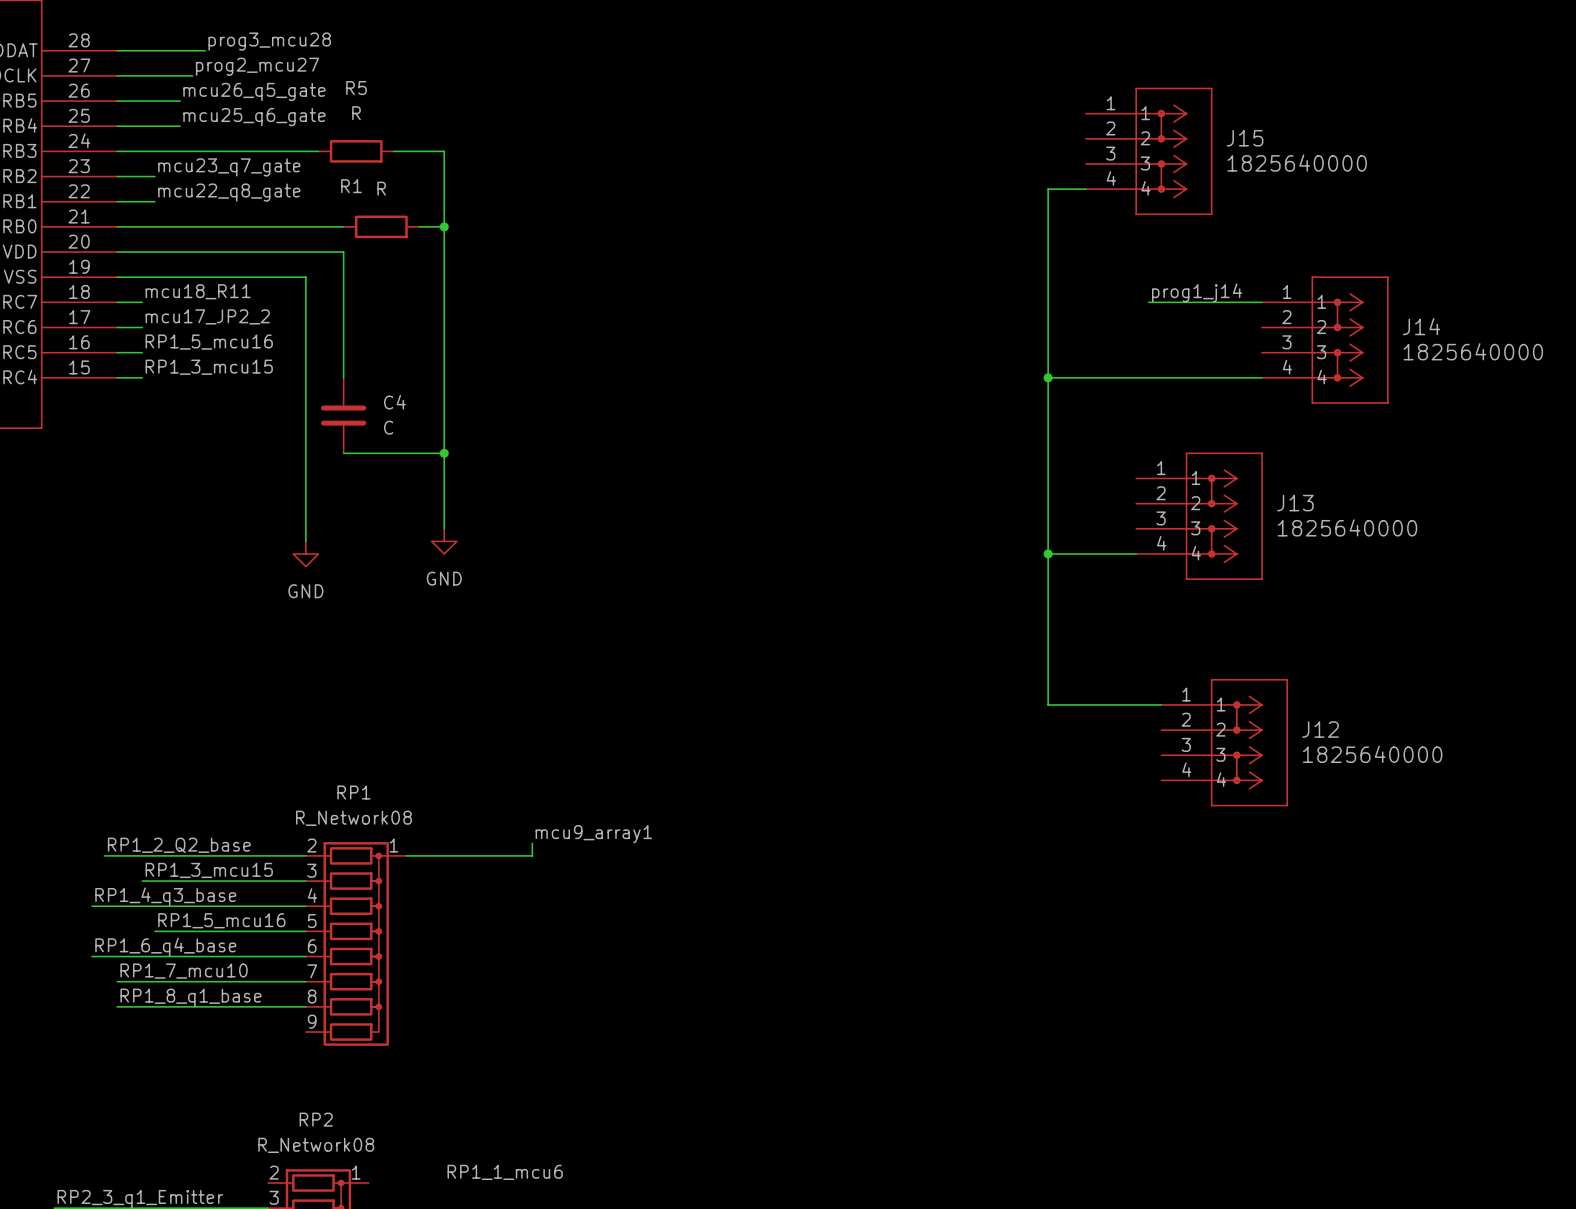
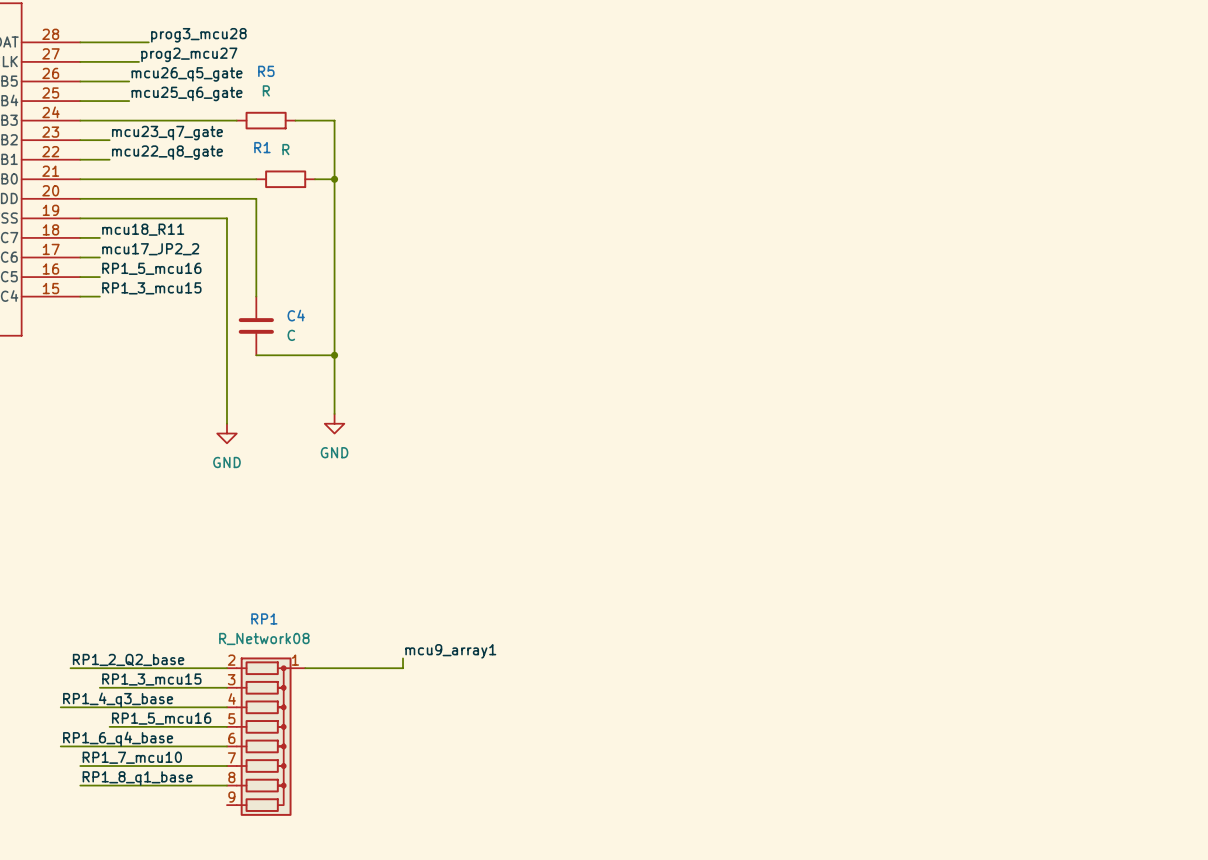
J15: 1825640000 (1149, 151) -> none
wire: (1085, 189) (1048, 189) (1048, 704) (1161, 704) -> none
label: prog1_j14 (1197, 292) -> none
wire: (1148, 302) (1262, 302) -> none
J14: 1825640000 (1325, 340) -> none
wire: (1048, 377) (1262, 377) -> none
junction: (1048, 377) -> none
J13: 1825640000 (1199, 516) -> none
wire: (1048, 553) (1136, 553) -> none
junction: (1048, 553) -> none
J12: 1825640000 (1224, 742) -> none

